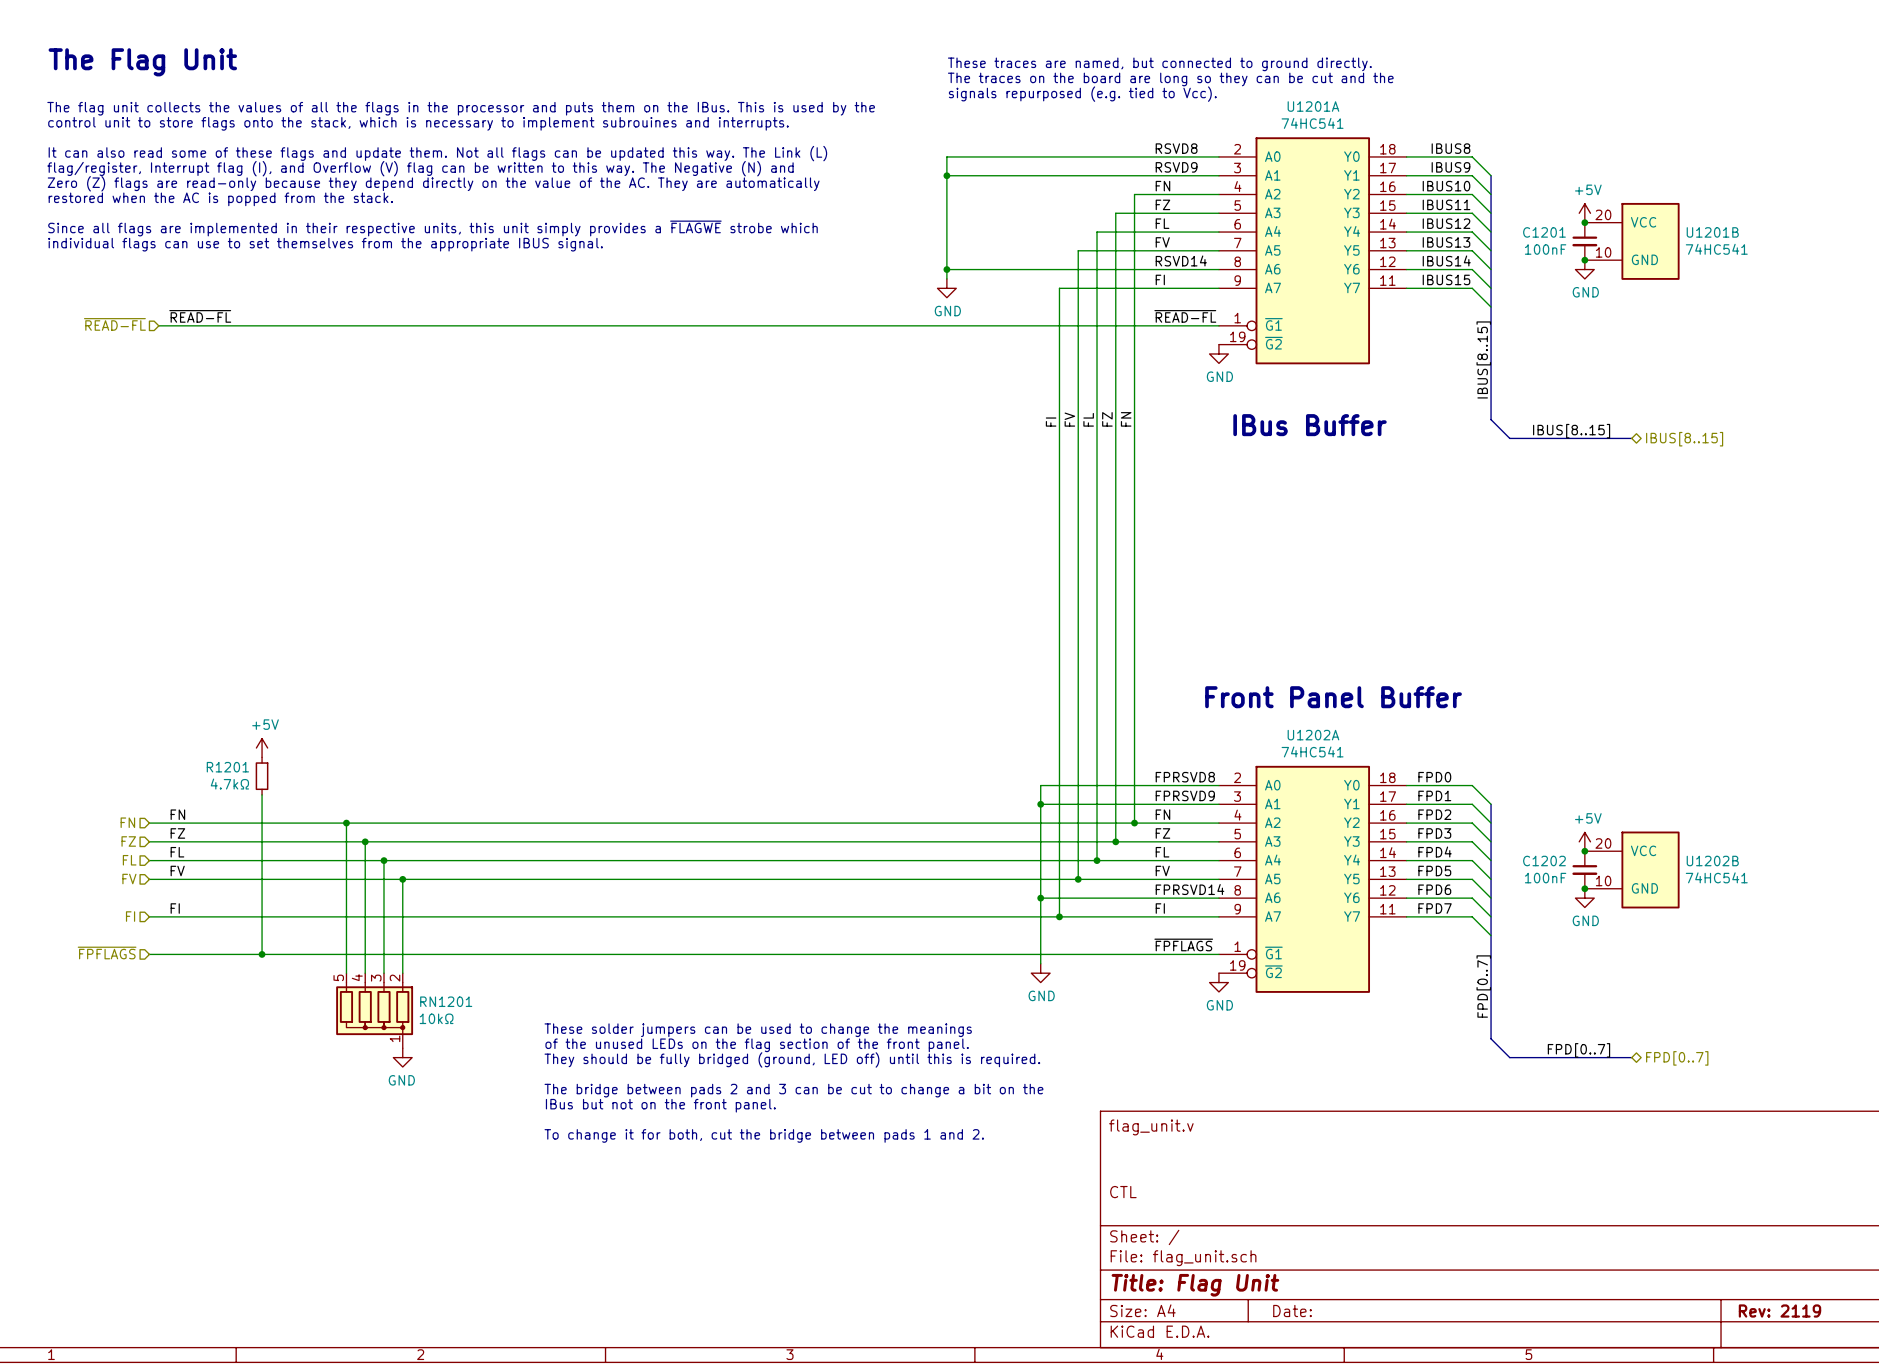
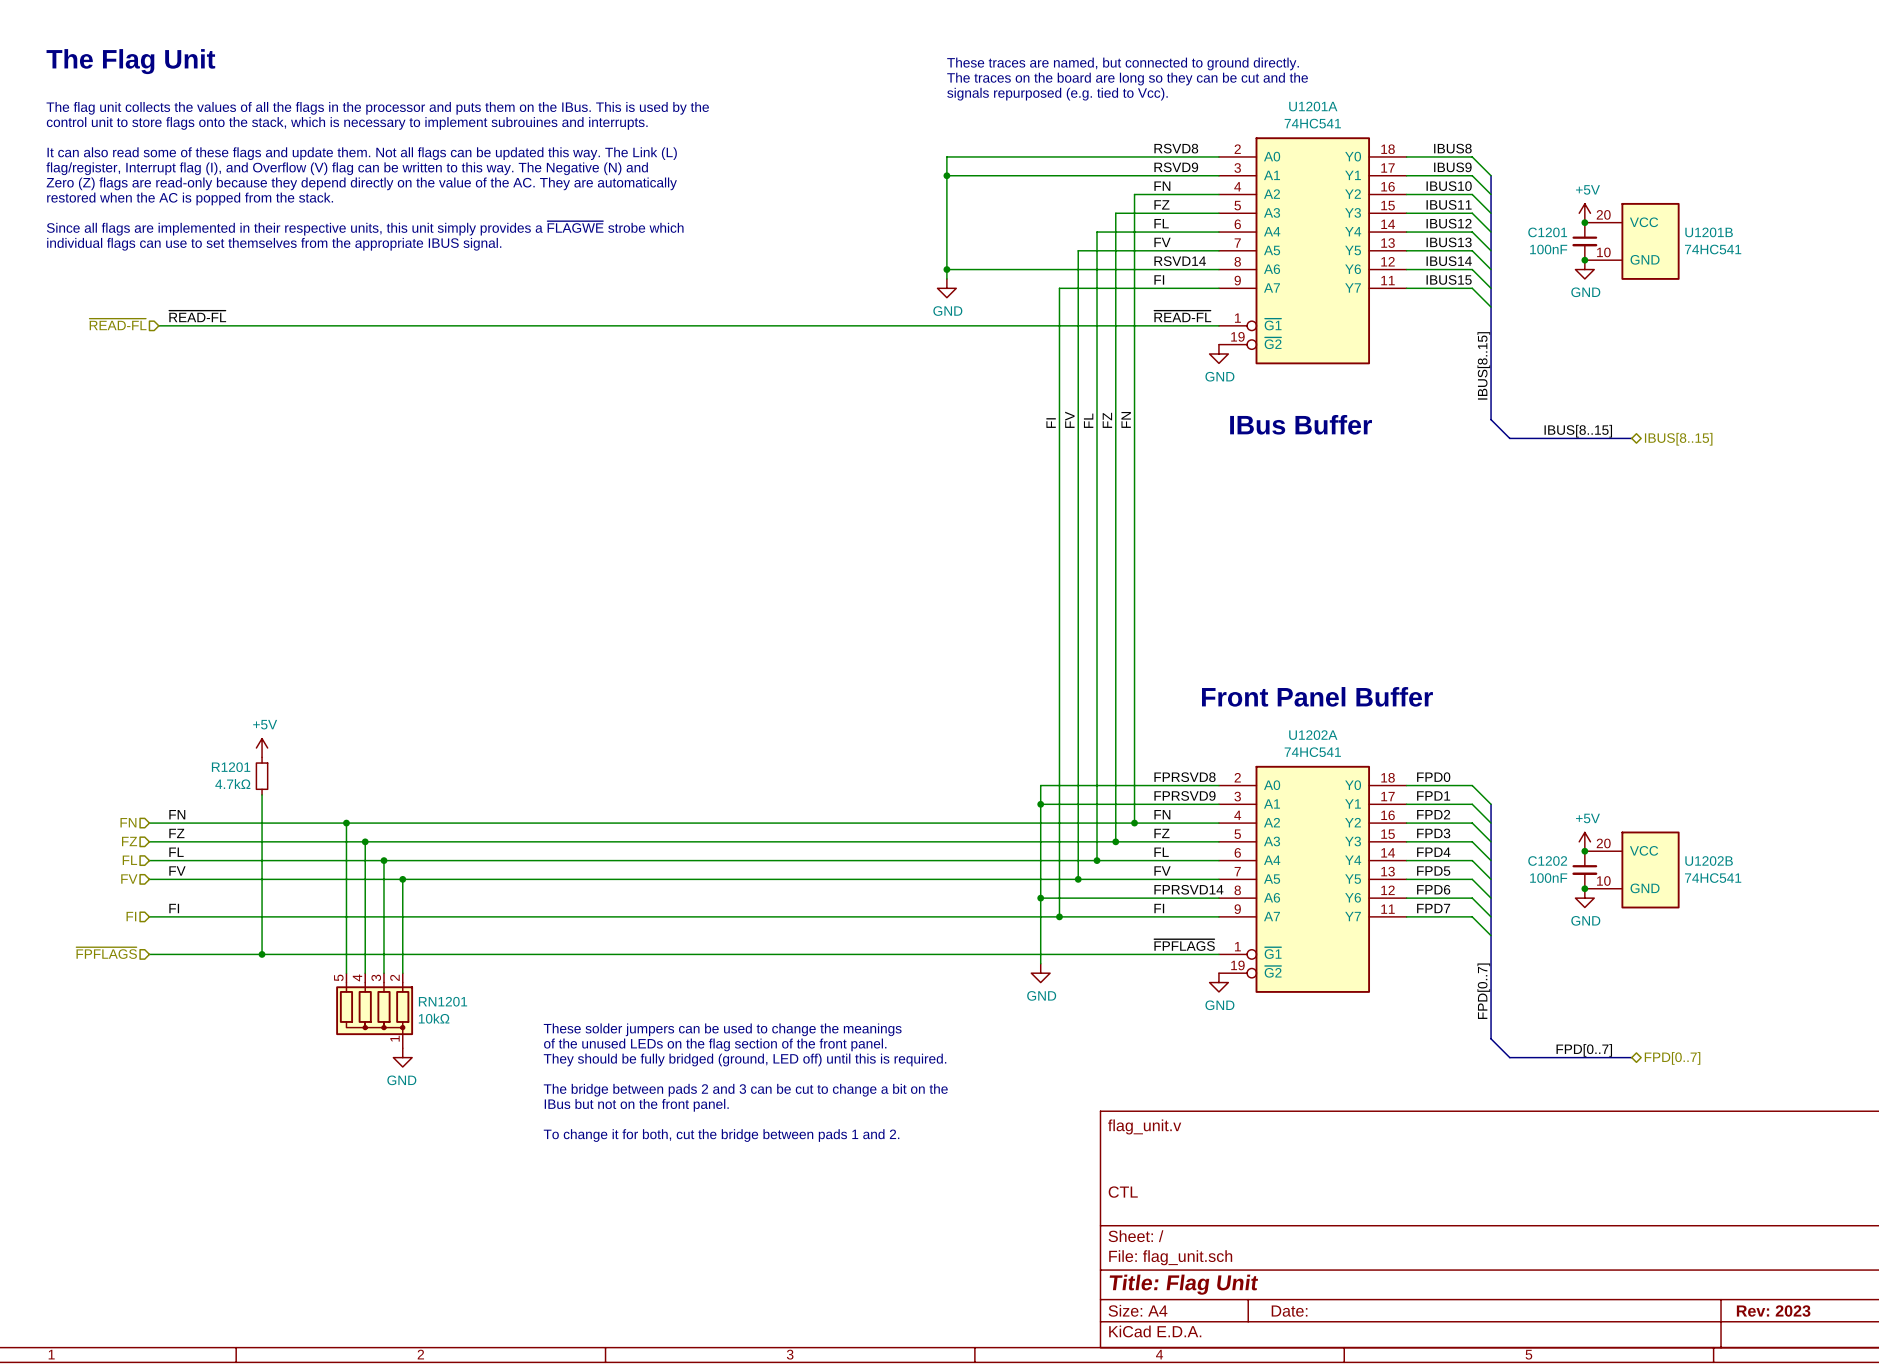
title block: Rev: 2119 (1779, 1311) -> Rev: 2023 (1773, 1311)

